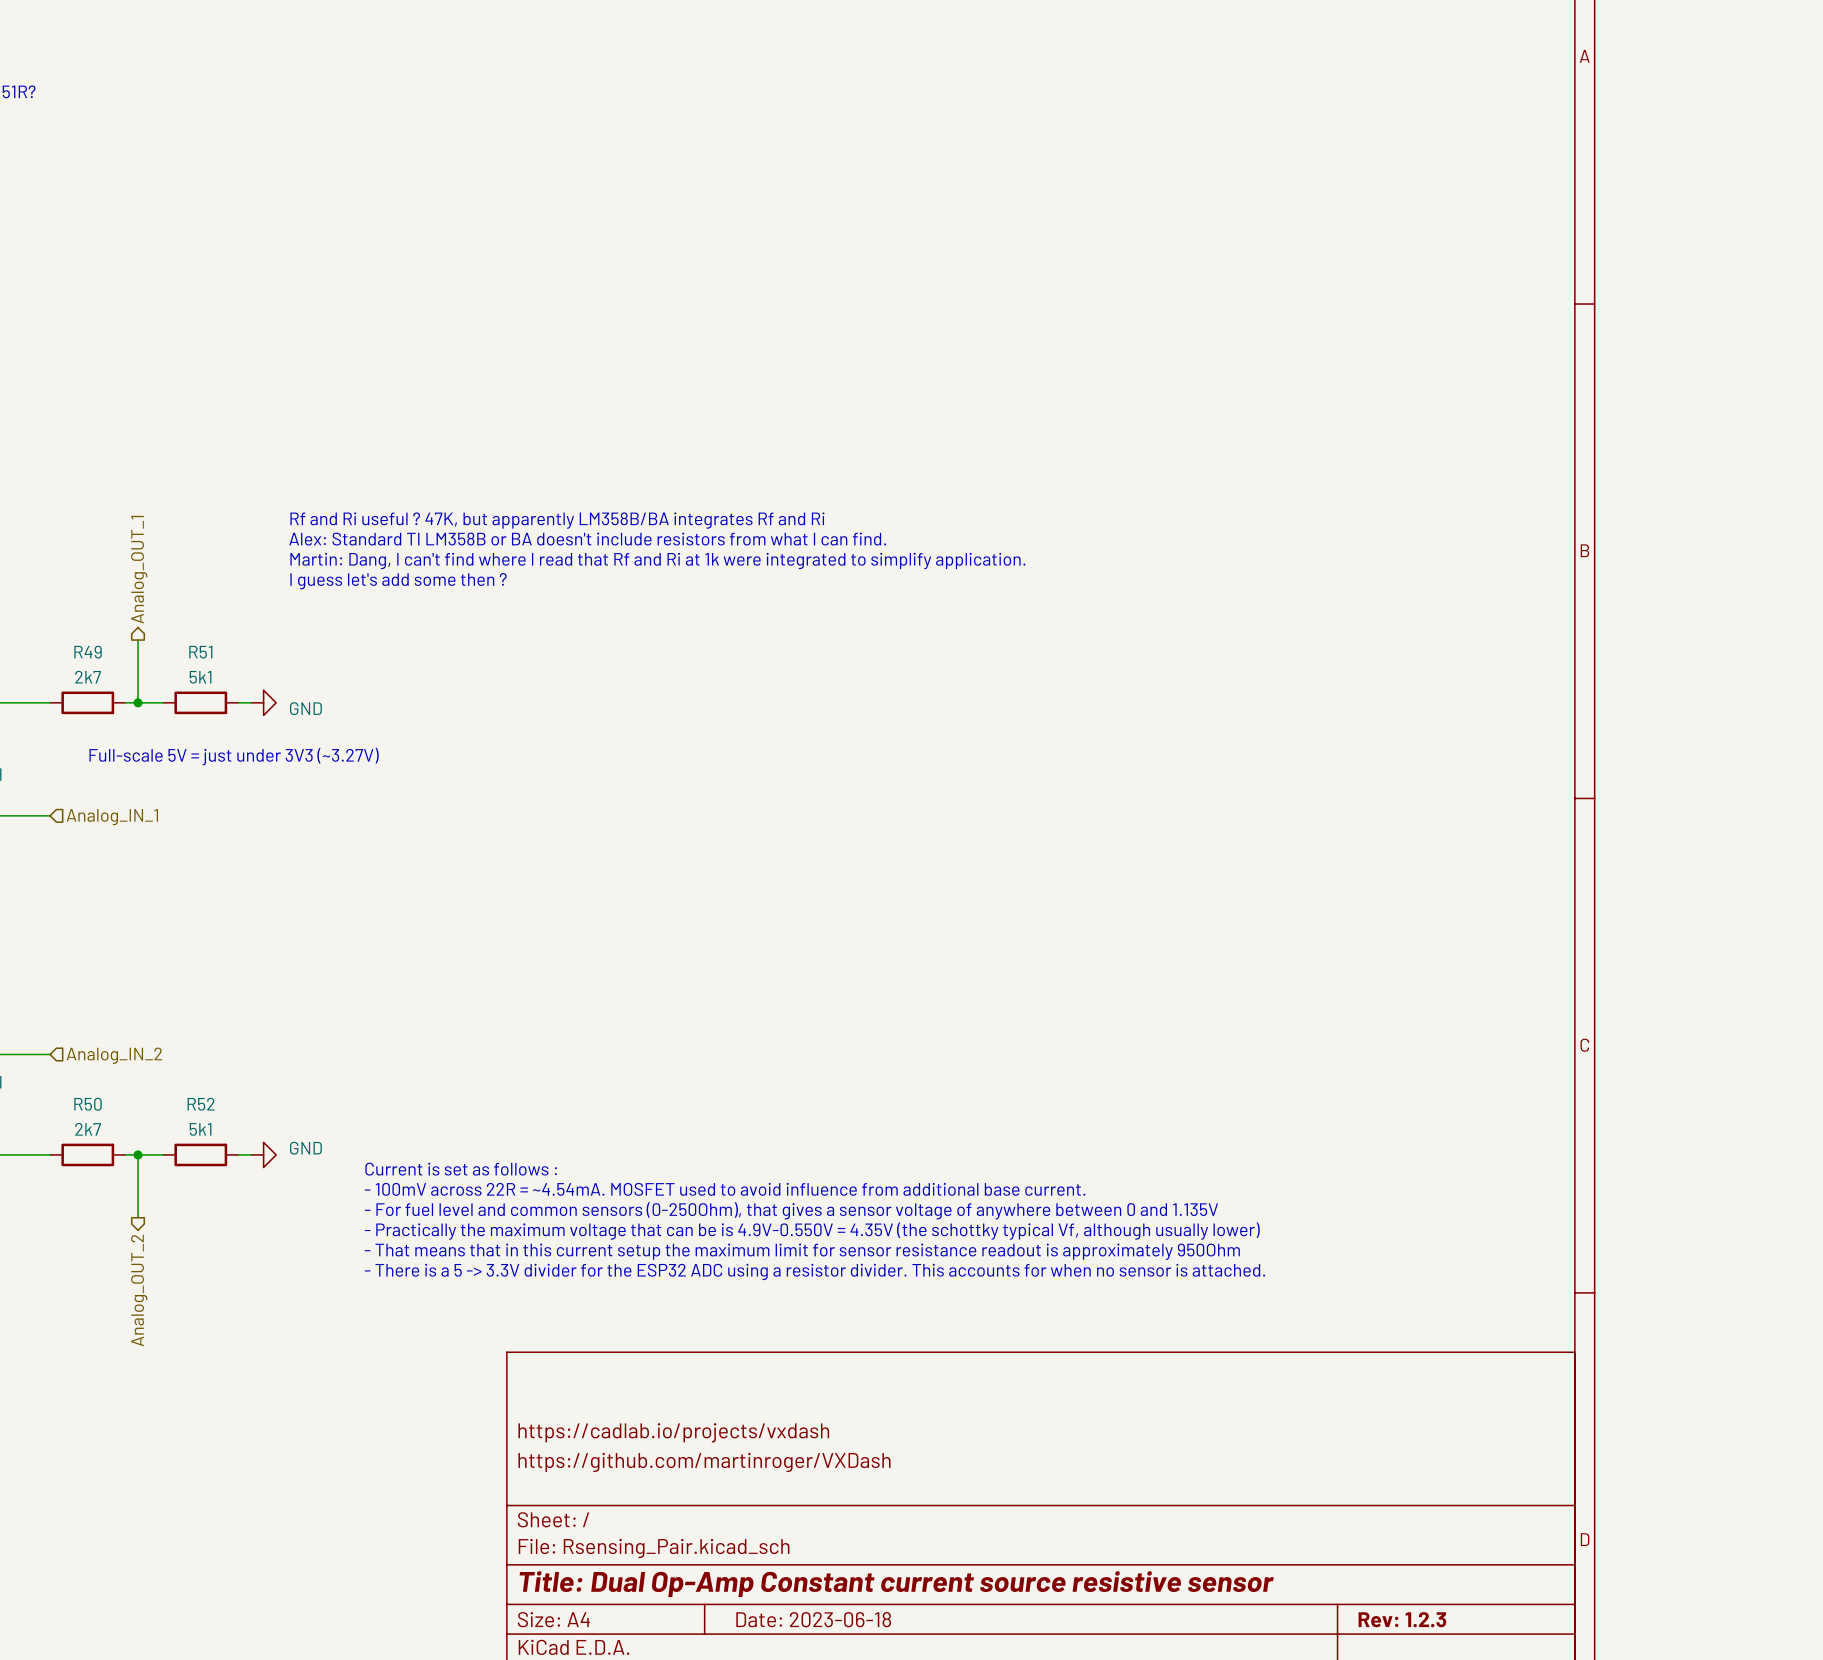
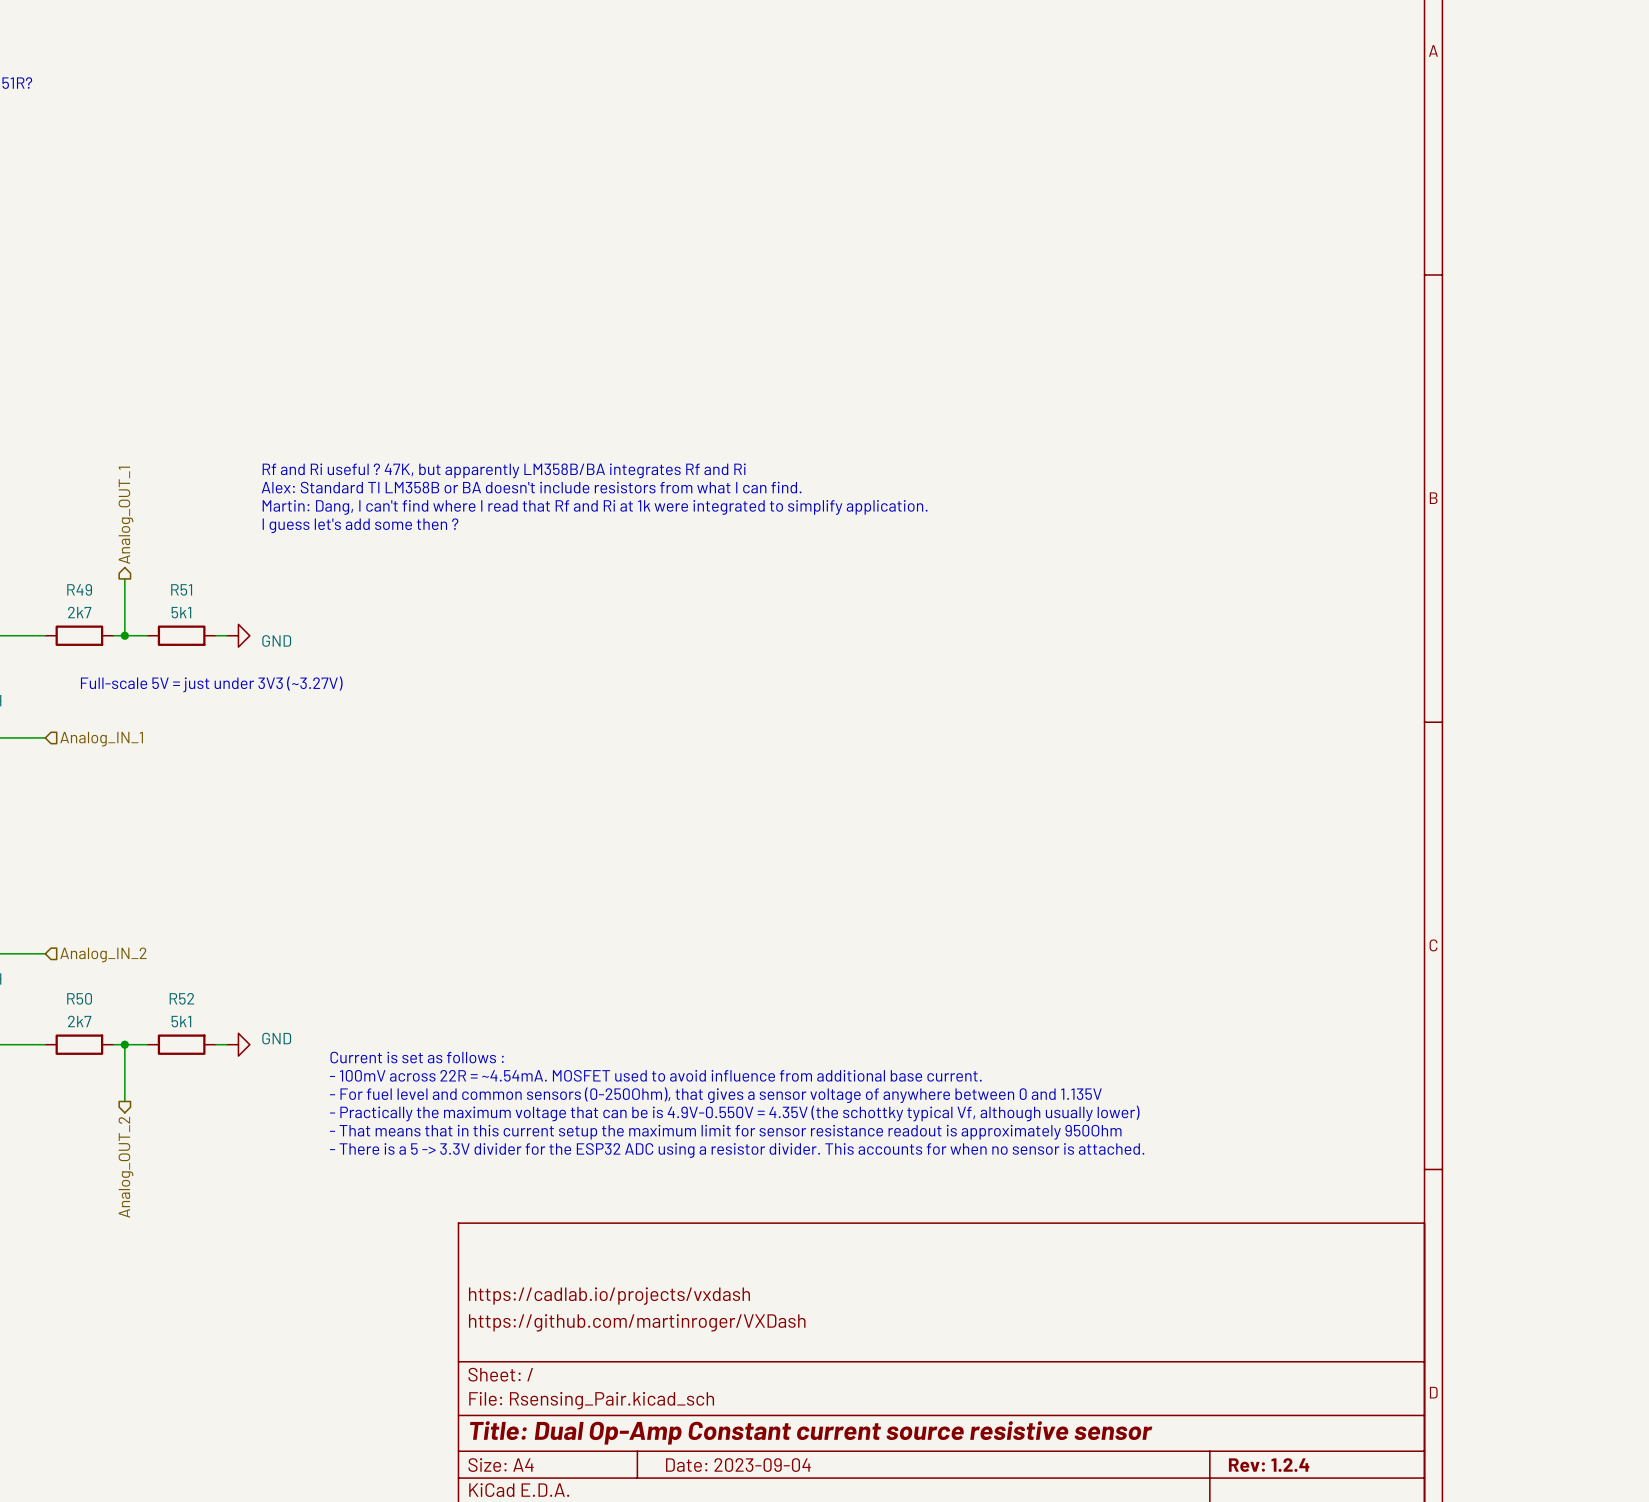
title block: Date: 2023-06-18 (813, 1619) -> Date: 2023-09-04 (738, 1465)
title block: Rev: 1.2.3 (1402, 1619) -> Rev: 1.2.4 (1269, 1465)

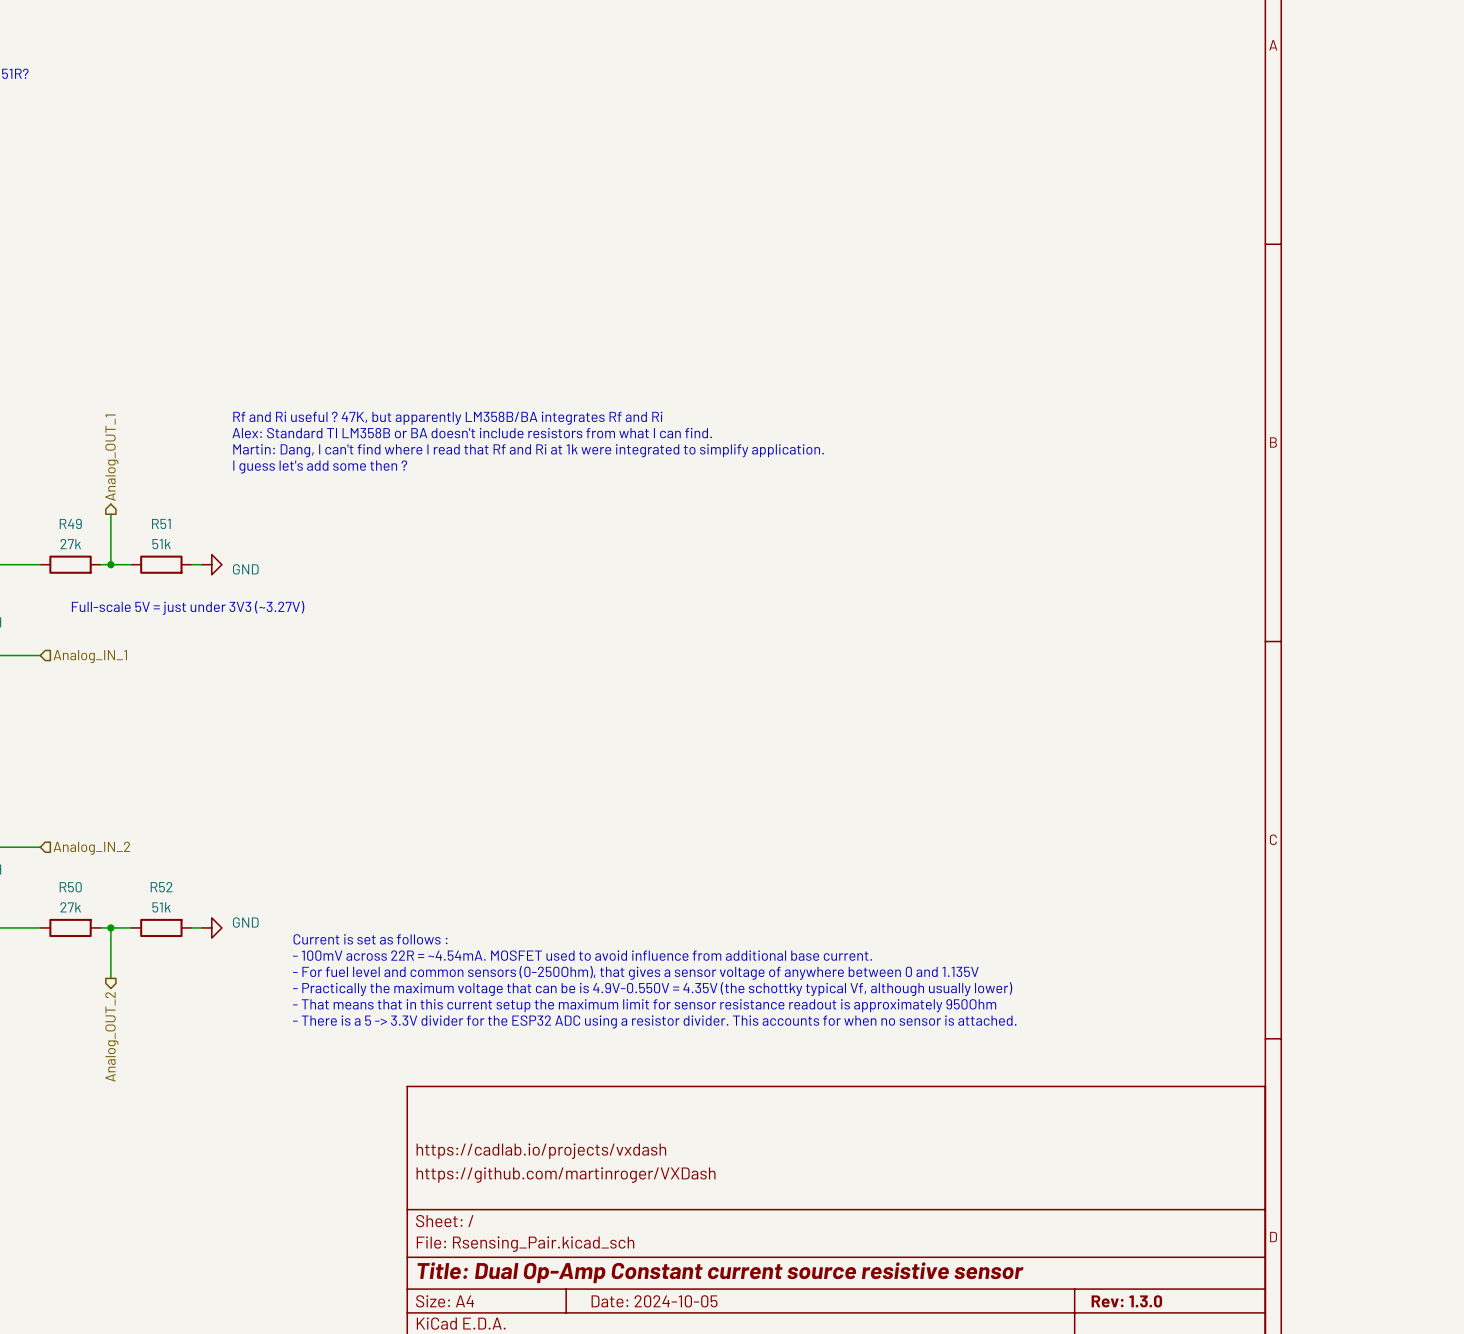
R49 value: 2k7 (79, 612) -> 27k (70, 544)
R51 value: 5k1 (181, 612) -> 51k (161, 544)
R50 value: 2k7 (79, 1021) -> 27k (70, 907)
R52 value: 5k1 (181, 1021) -> 51k (161, 907)
title block: Date: 2023-09-04 (738, 1465) -> Date: 2024-10-05 (654, 1301)
title block: Rev: 1.2.4 (1269, 1465) -> Rev: 1.3.0 (1126, 1301)

